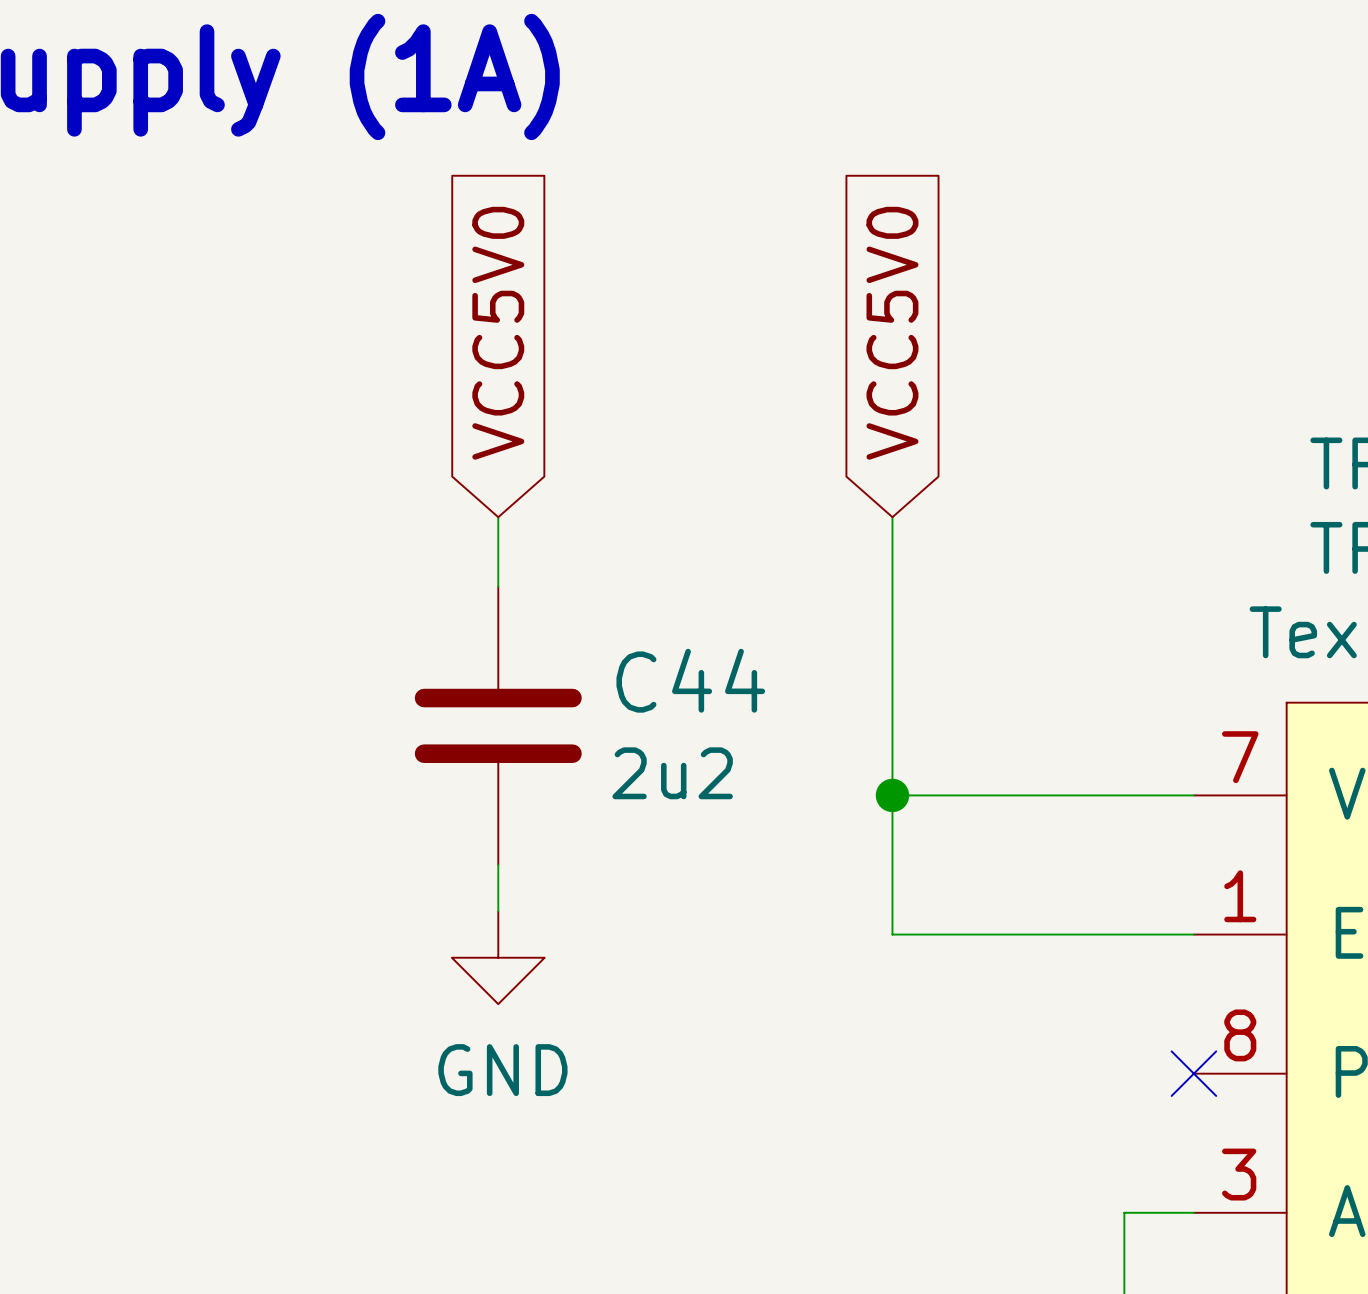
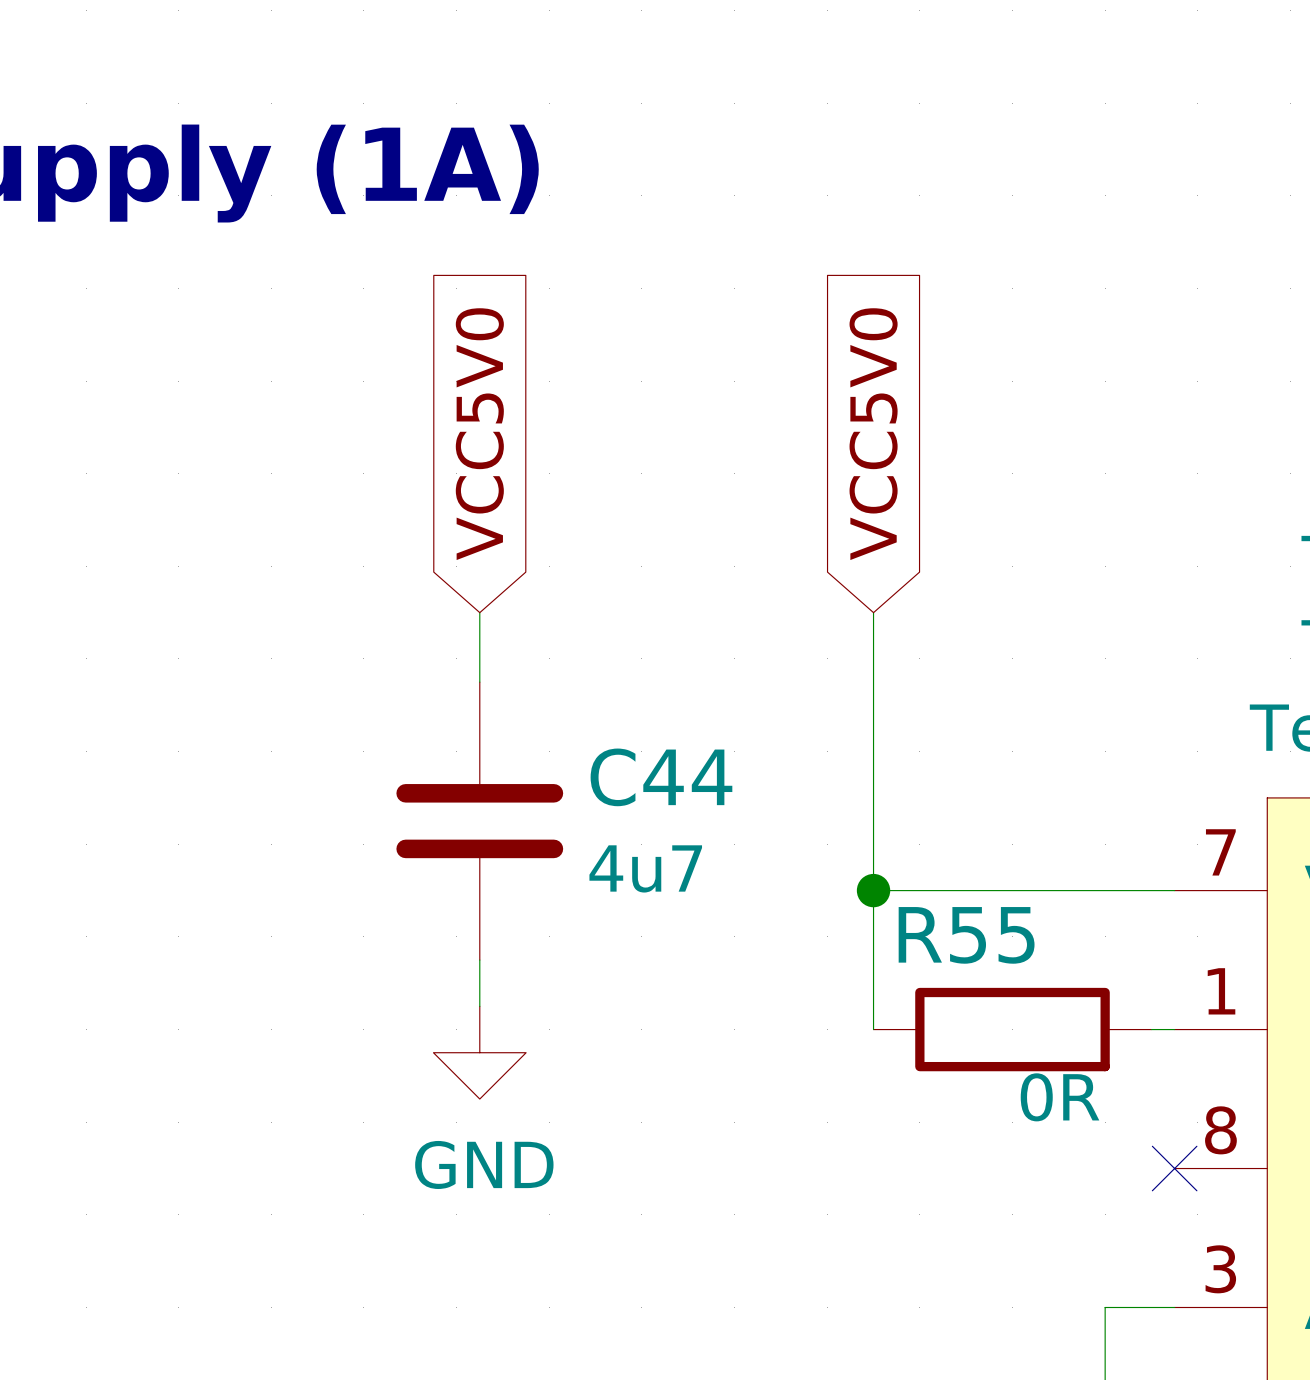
C44 text: 2u2 (672, 773) -> 4u7 (645, 868)
wire: (892, 934) (1170, 934) -> none
R55: none -> (1012, 1029)

